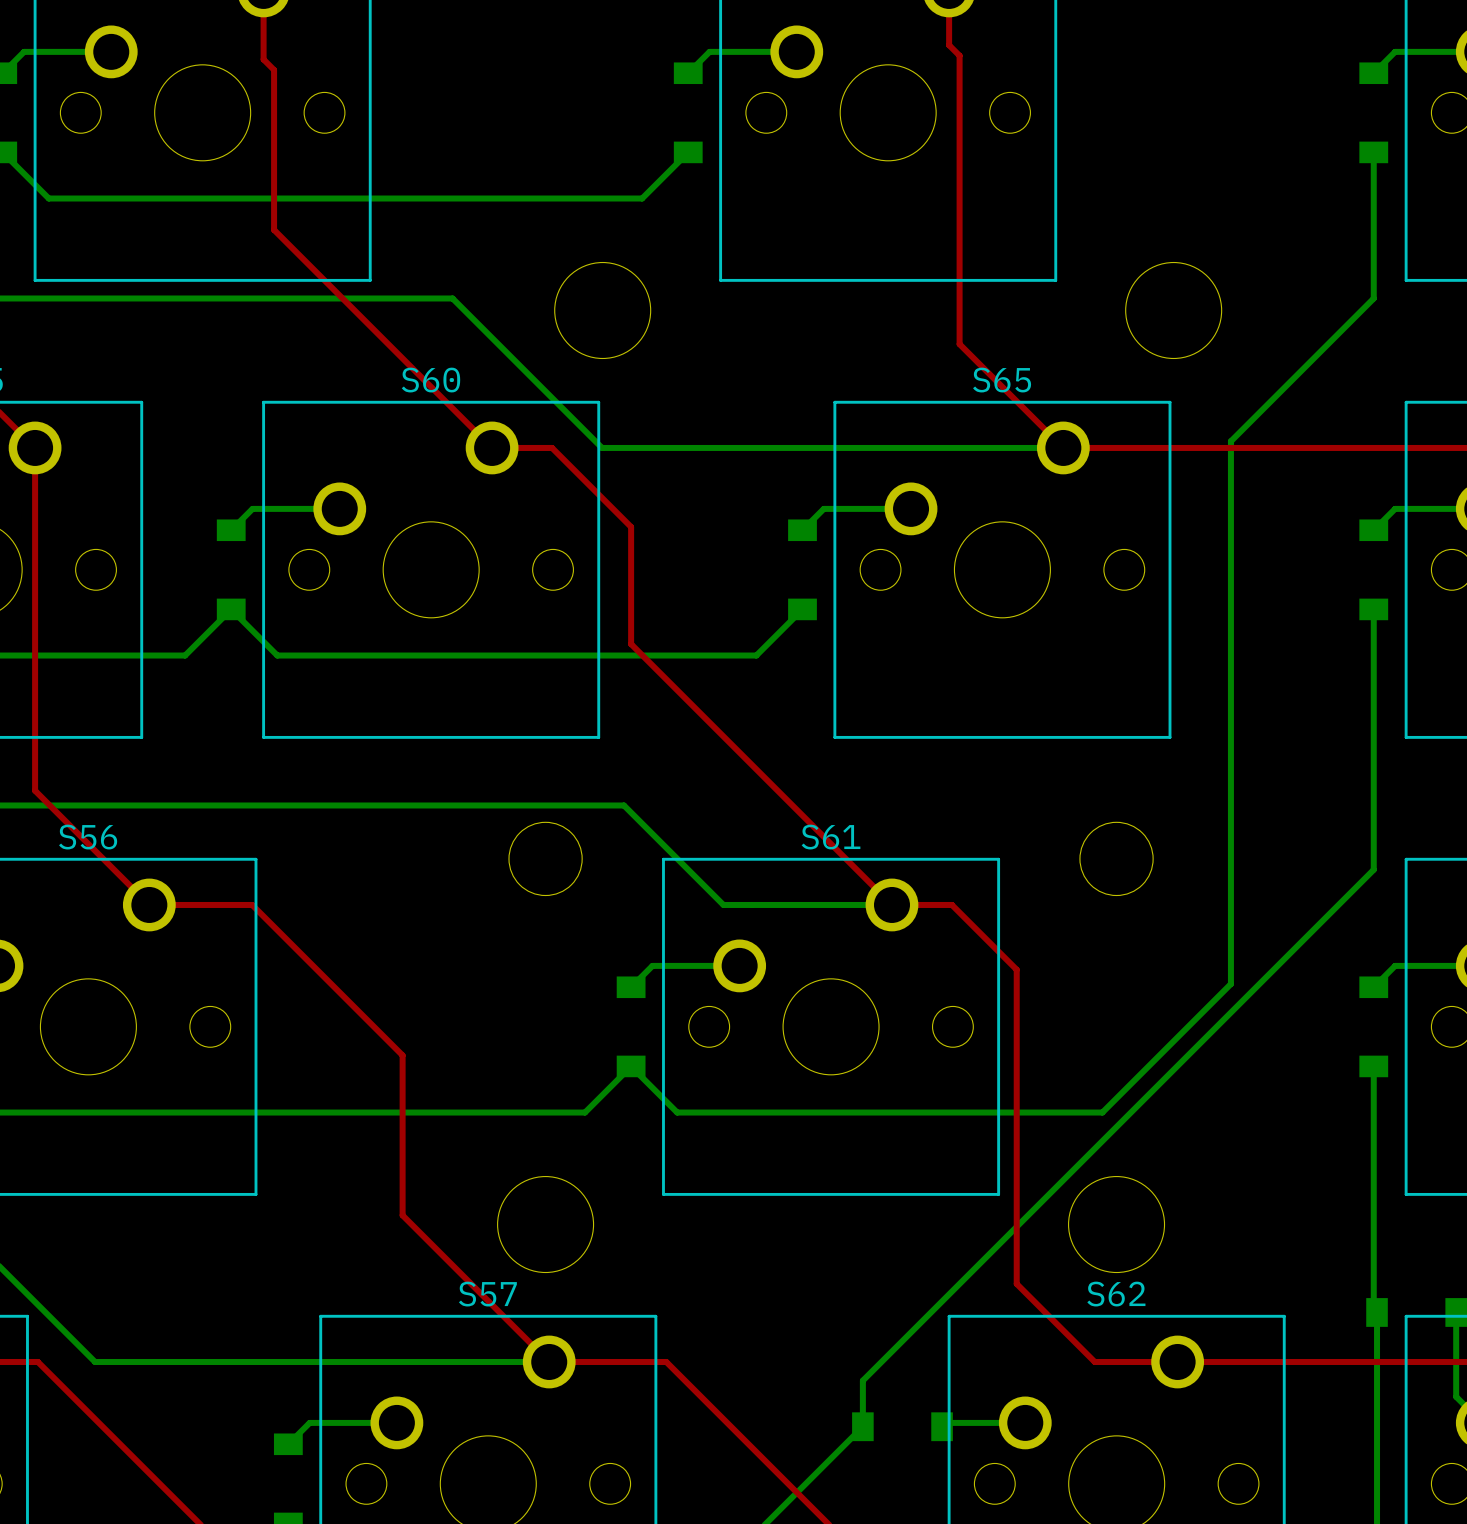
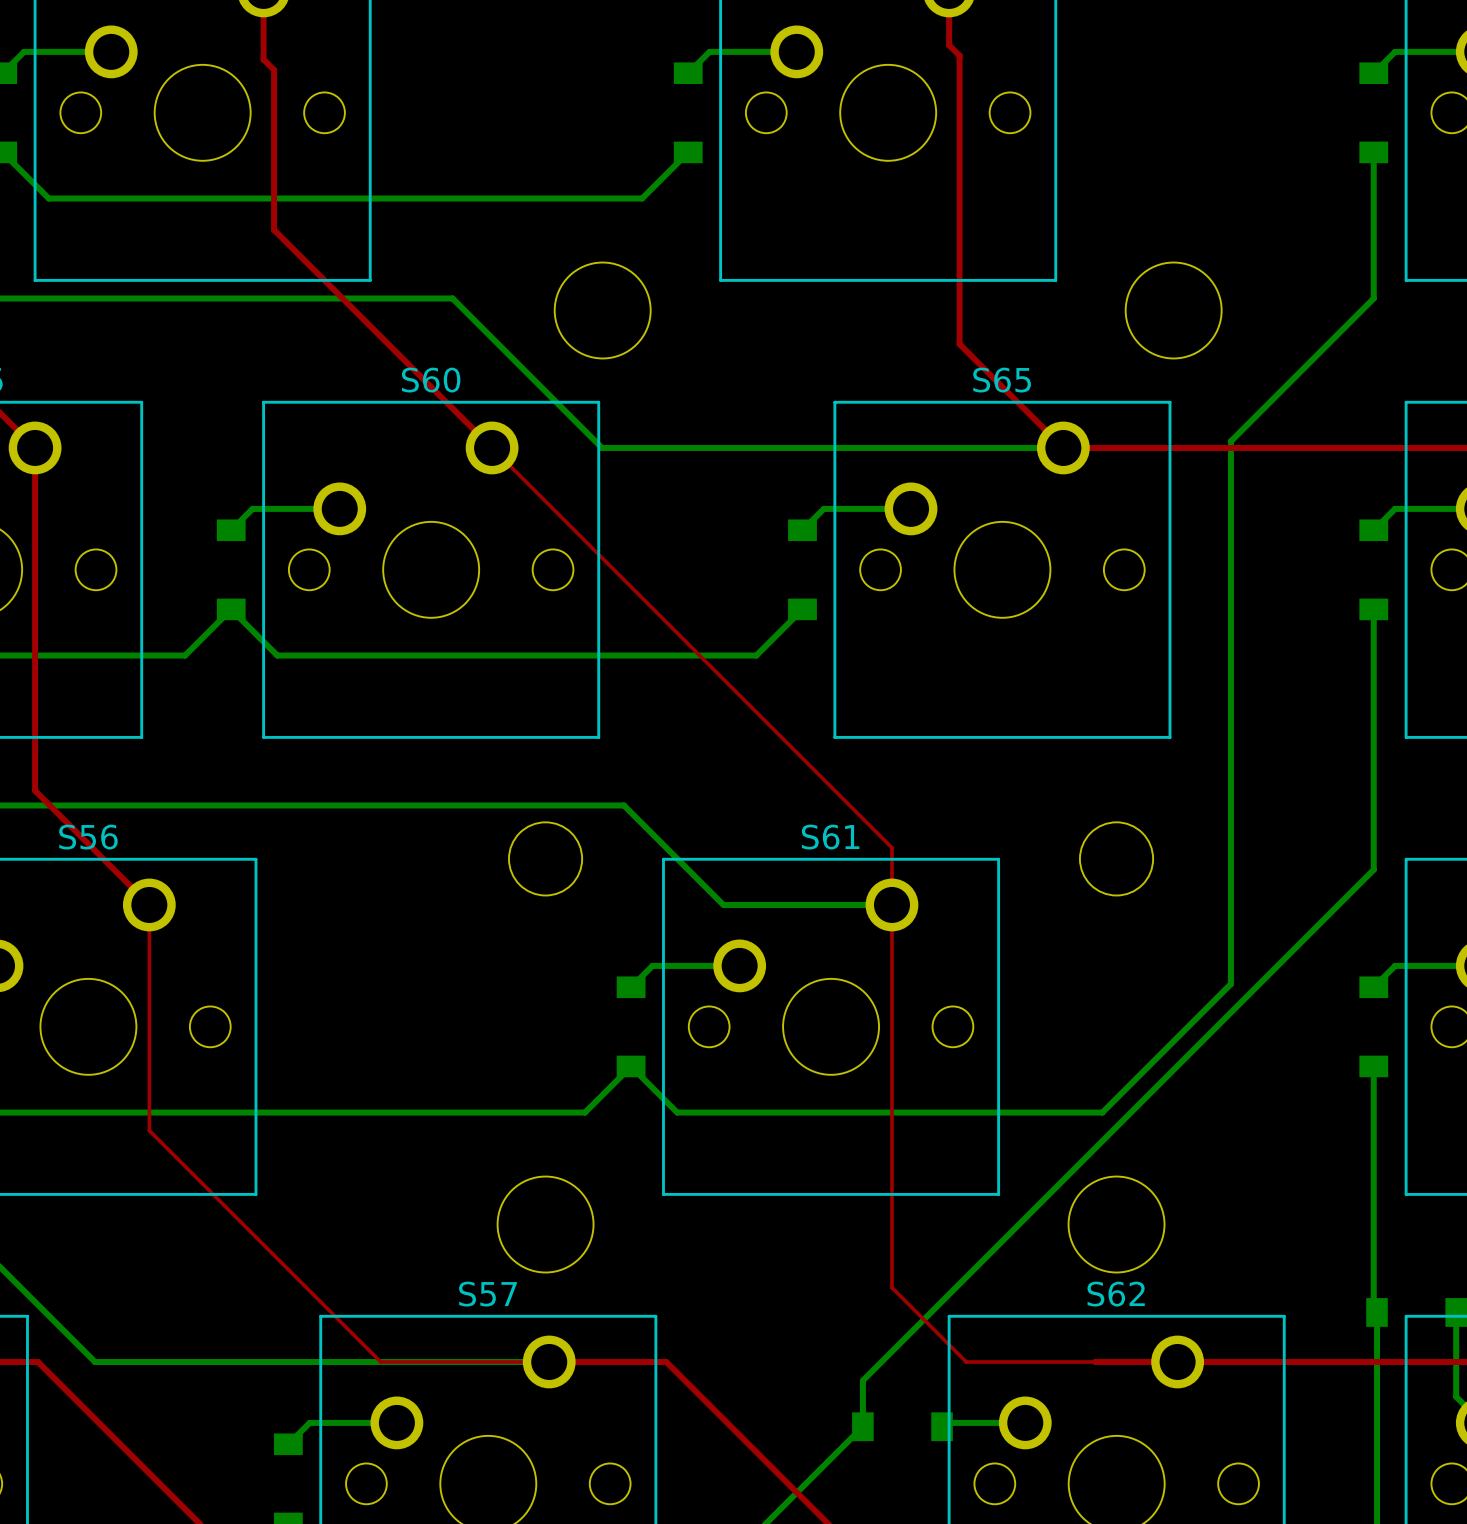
top track: (492, 447) (552, 447) (631, 526) (631, 644) (891, 904) (951, 904) (1016, 969) (1016, 1283) (1094, 1361) -> (492, 447) (891, 847) (891, 1287) (966, 1361) (1094, 1361)
top track: (149, 904) (252, 904) (402, 1055) (402, 1215) (549, 1361) -> (149, 904) (149, 1130) (380, 1361) (549, 1361)

